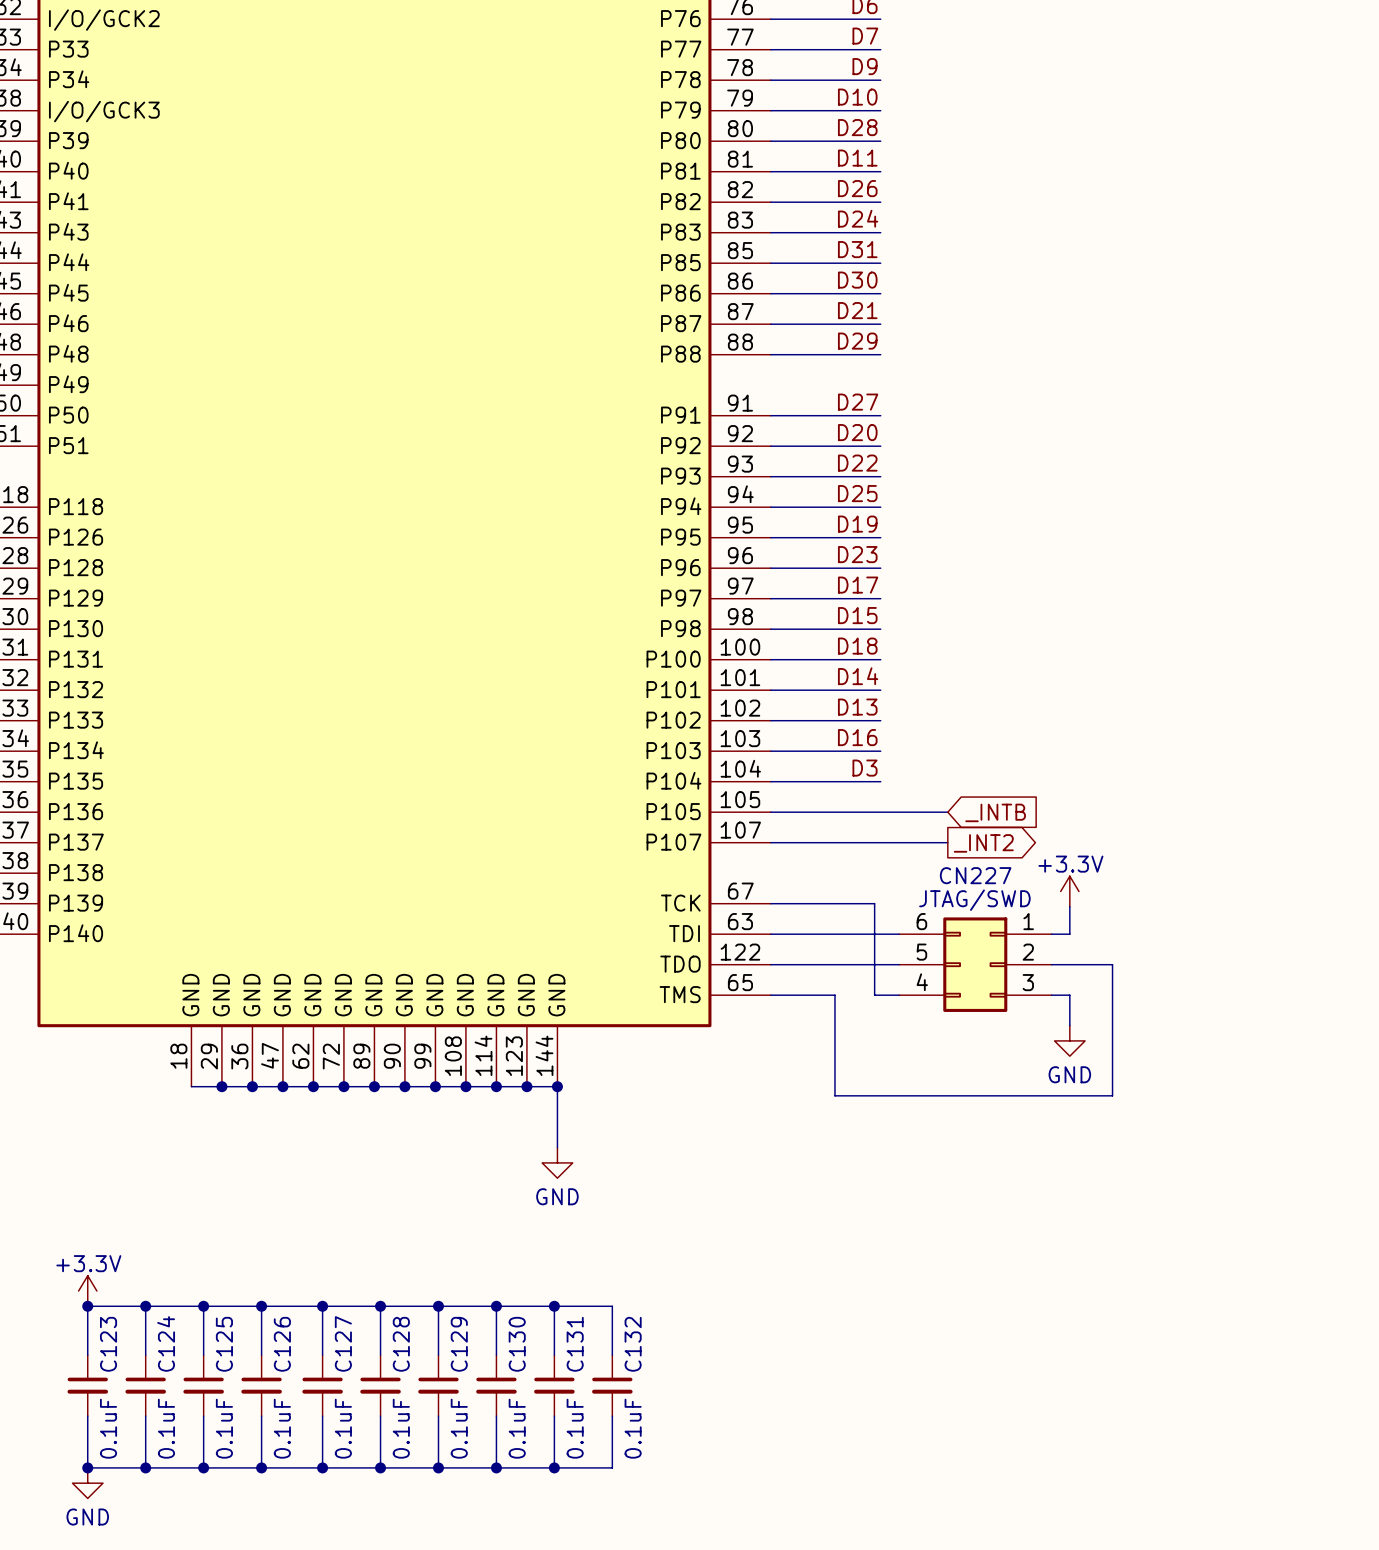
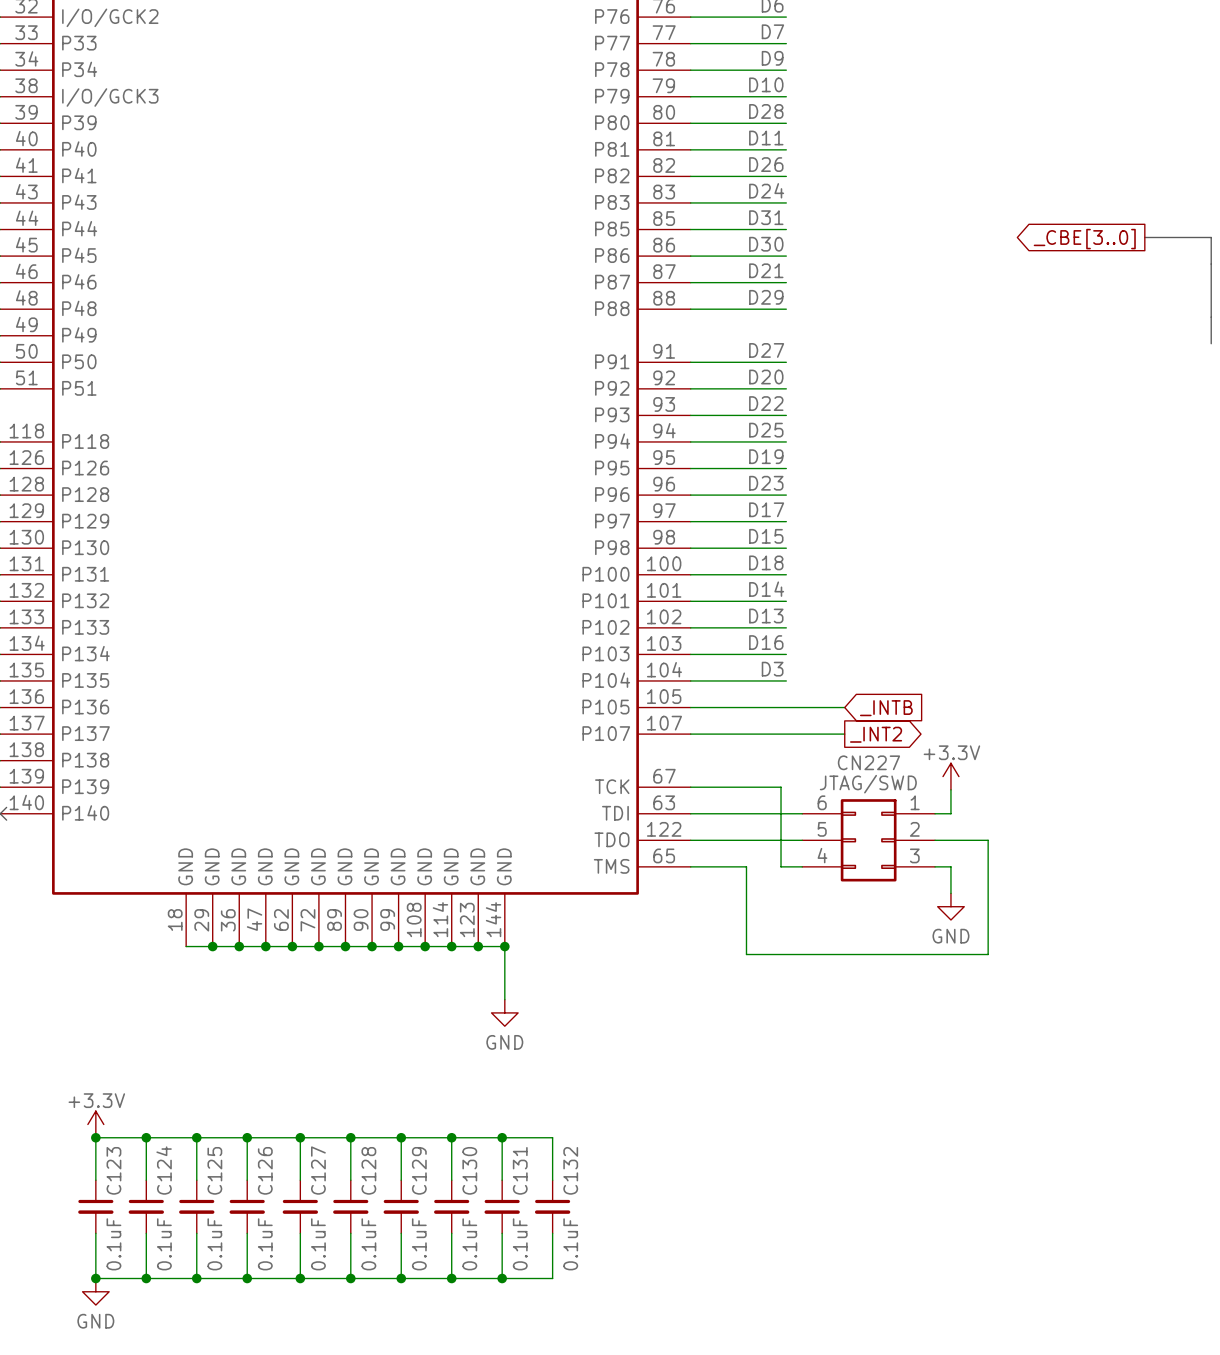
bus: none -> (1144, 237) (1211, 237) (1211, 343)
global label: none -> _CBE[3..0] (1084, 239)

